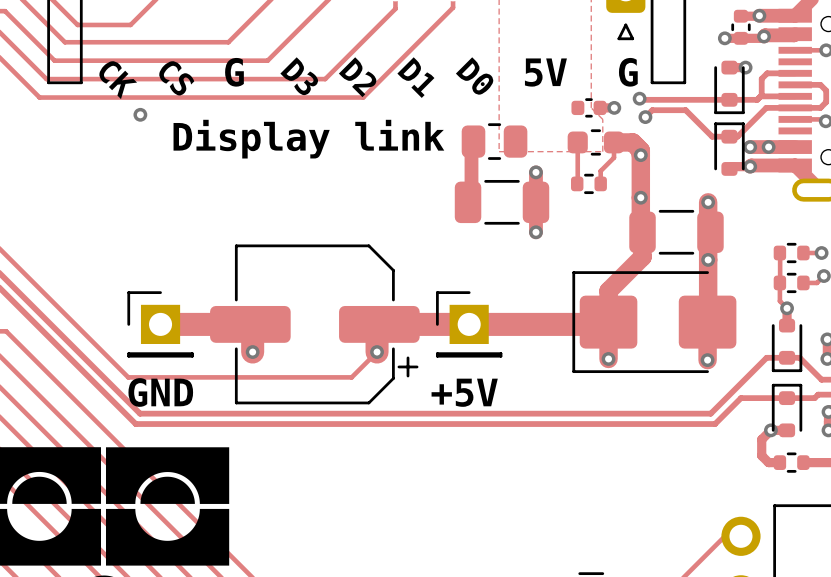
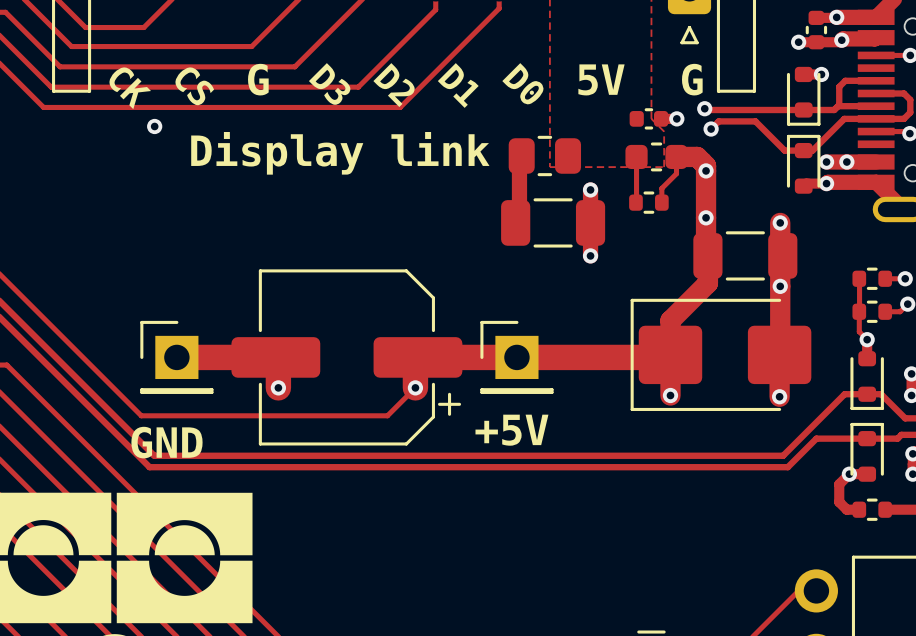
part value: none -> +5V (511, 430)
text: GND (160, 392) -> none
text: +5V (464, 392) -> none
part value: none -> GND (166, 442)

